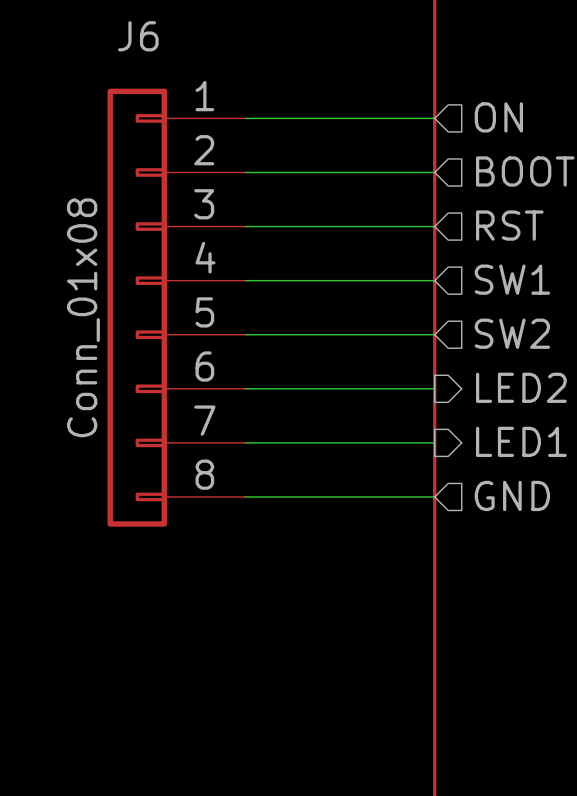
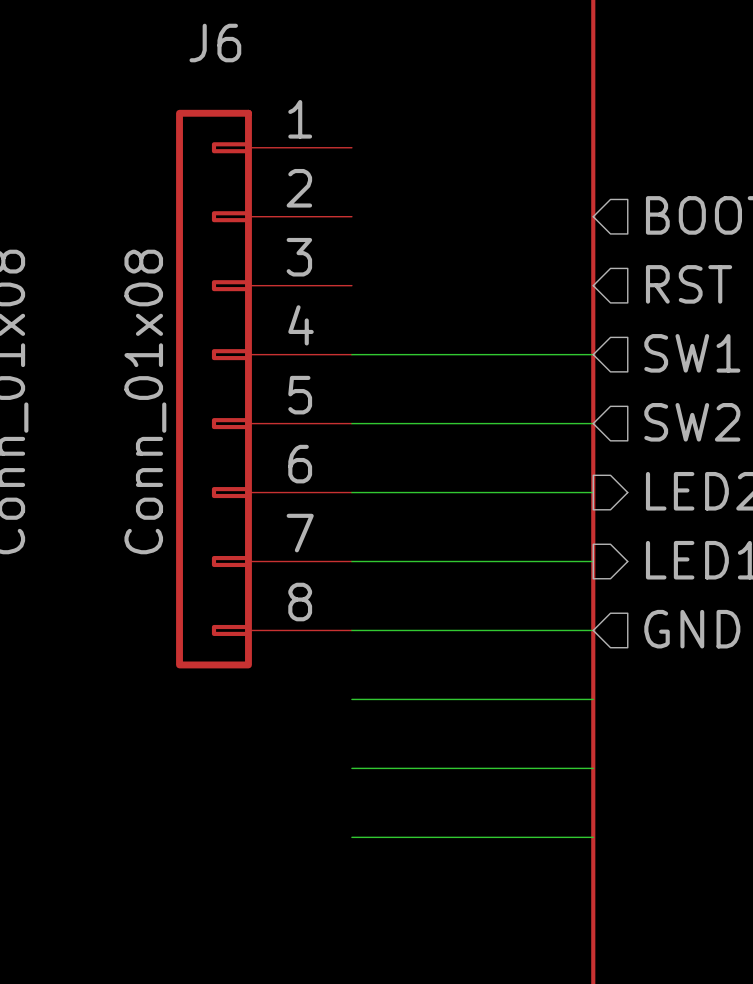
sheet pin: ON (498, 117) -> none
wire: (245, 118) (434, 118) -> (351, 699) (593, 699)
wire: (245, 172) (434, 172) -> (351, 768) (593, 768)
wire: (245, 226) (434, 226) -> (351, 837) (593, 837)

